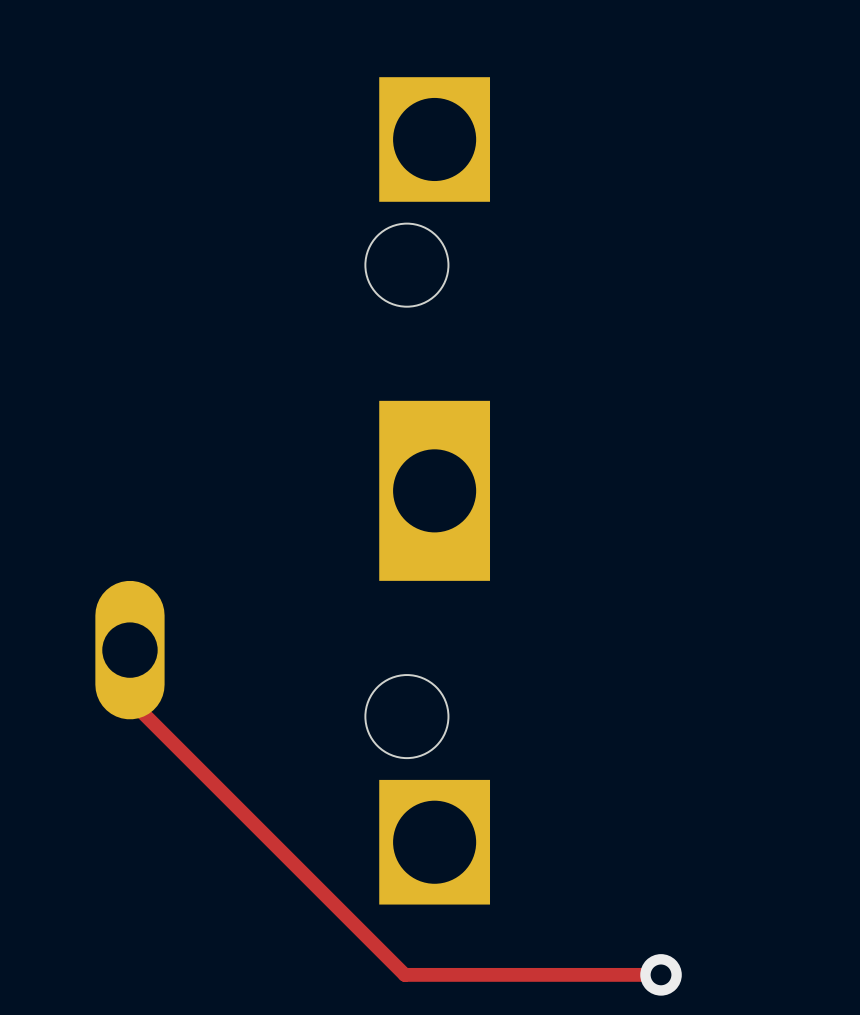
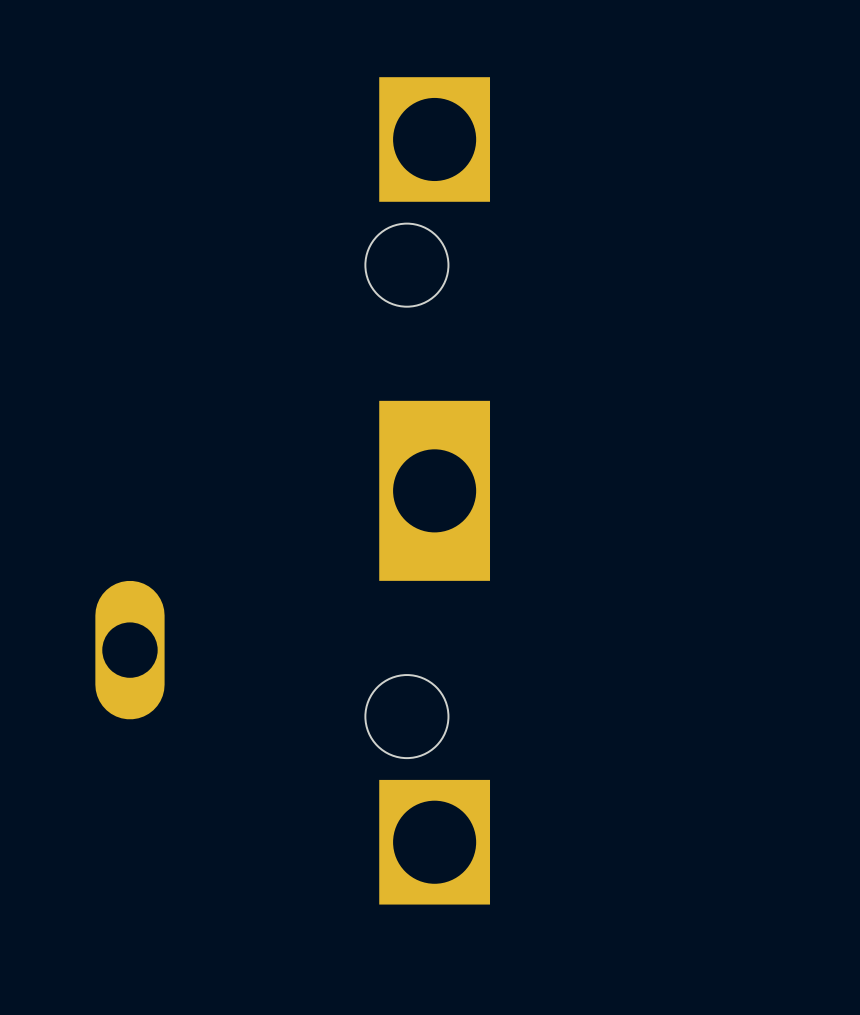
track: (127, 649) (127, 697) (404, 974) (654, 974) -> none
via: (661, 974) -> none

